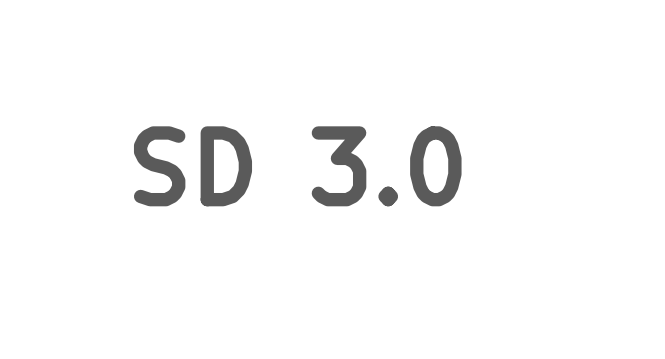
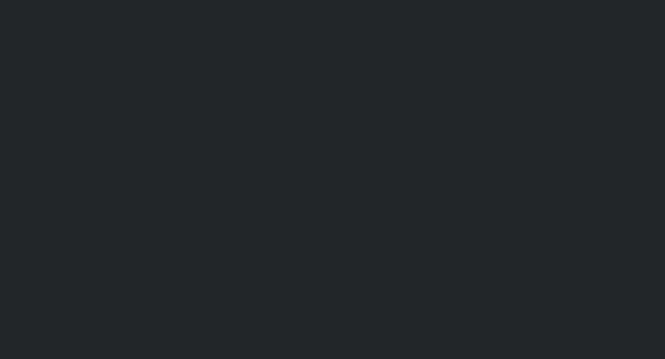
text: SD 3.0 (297, 166) -> none

